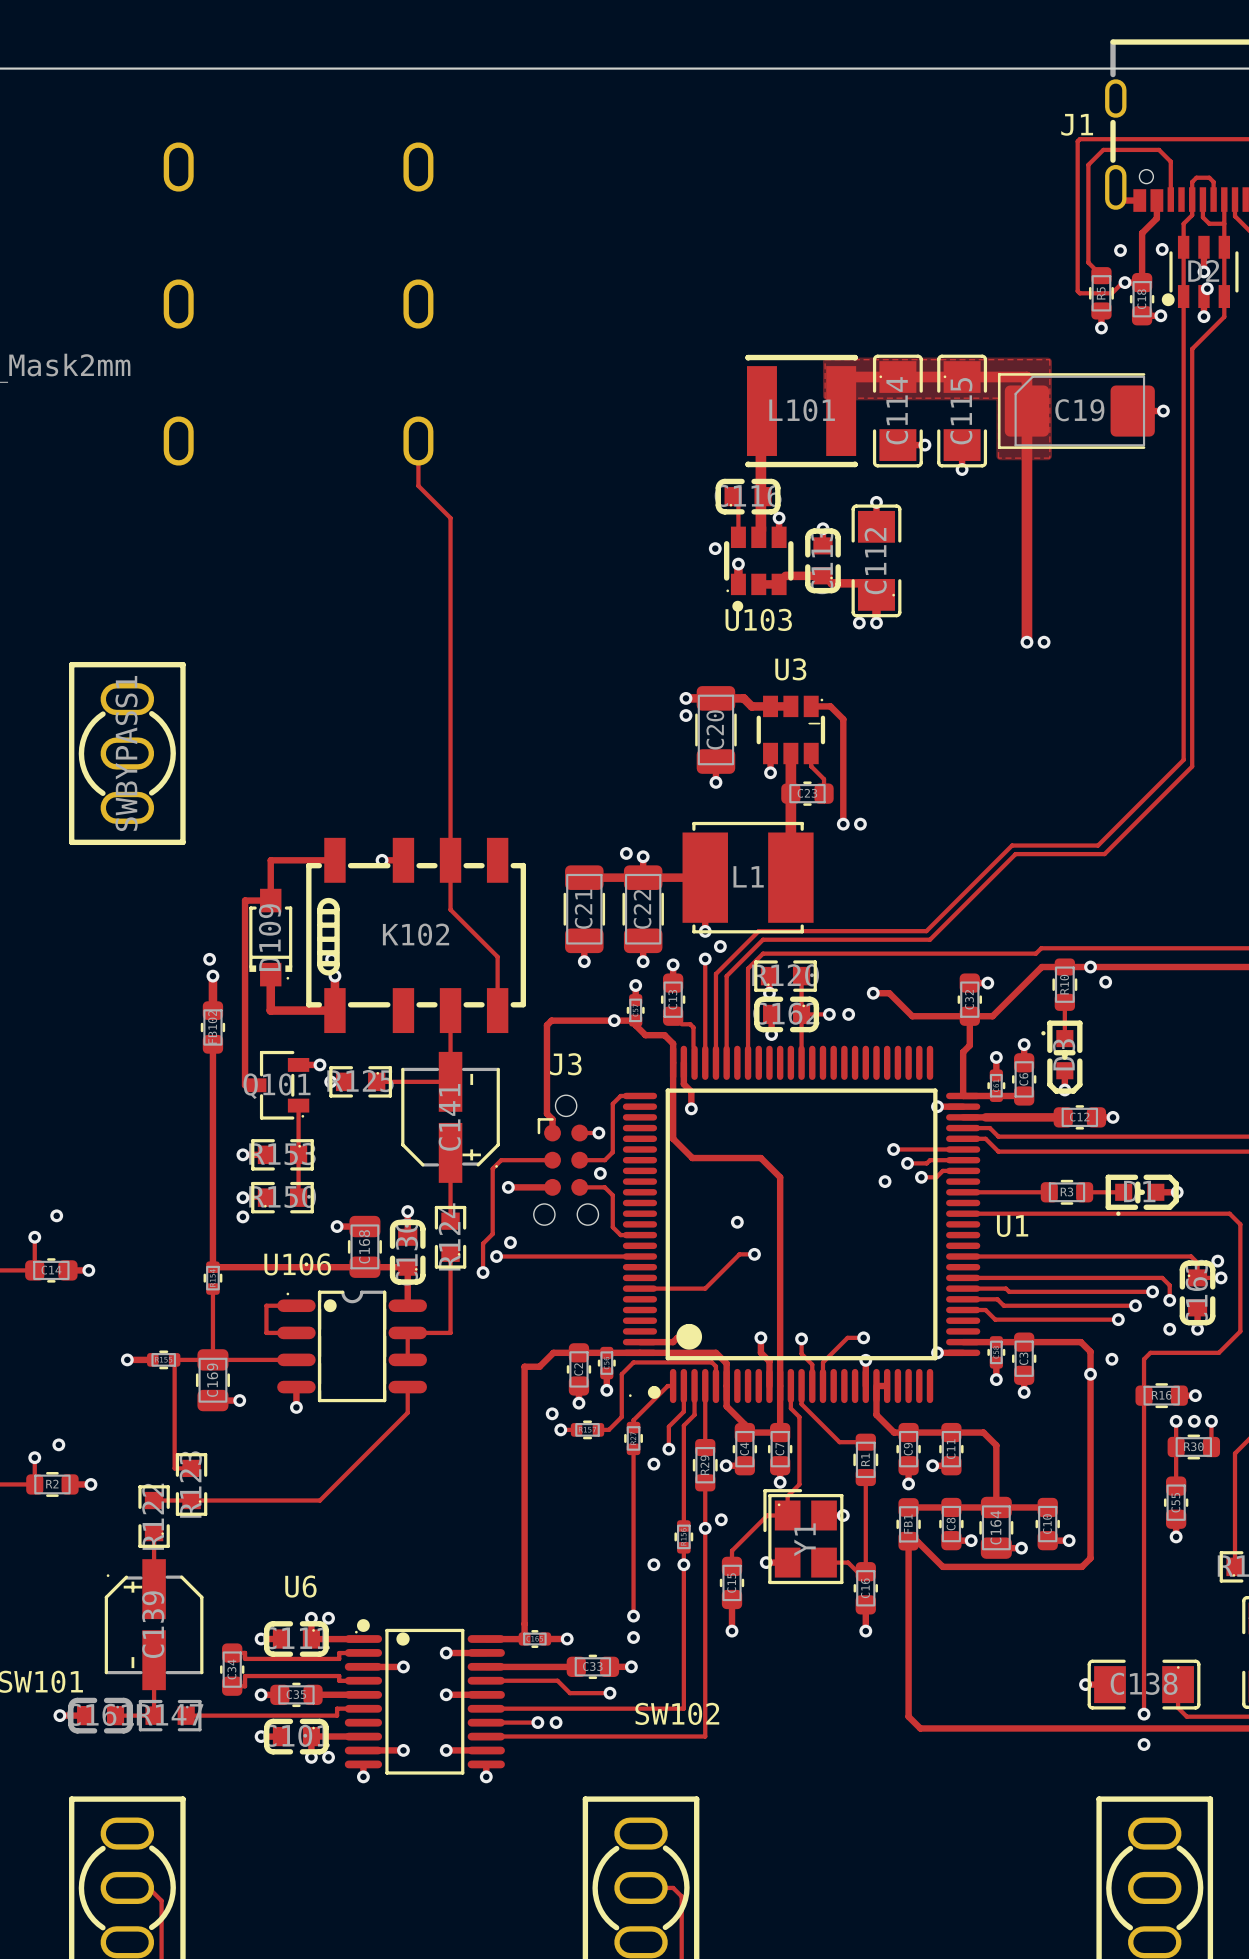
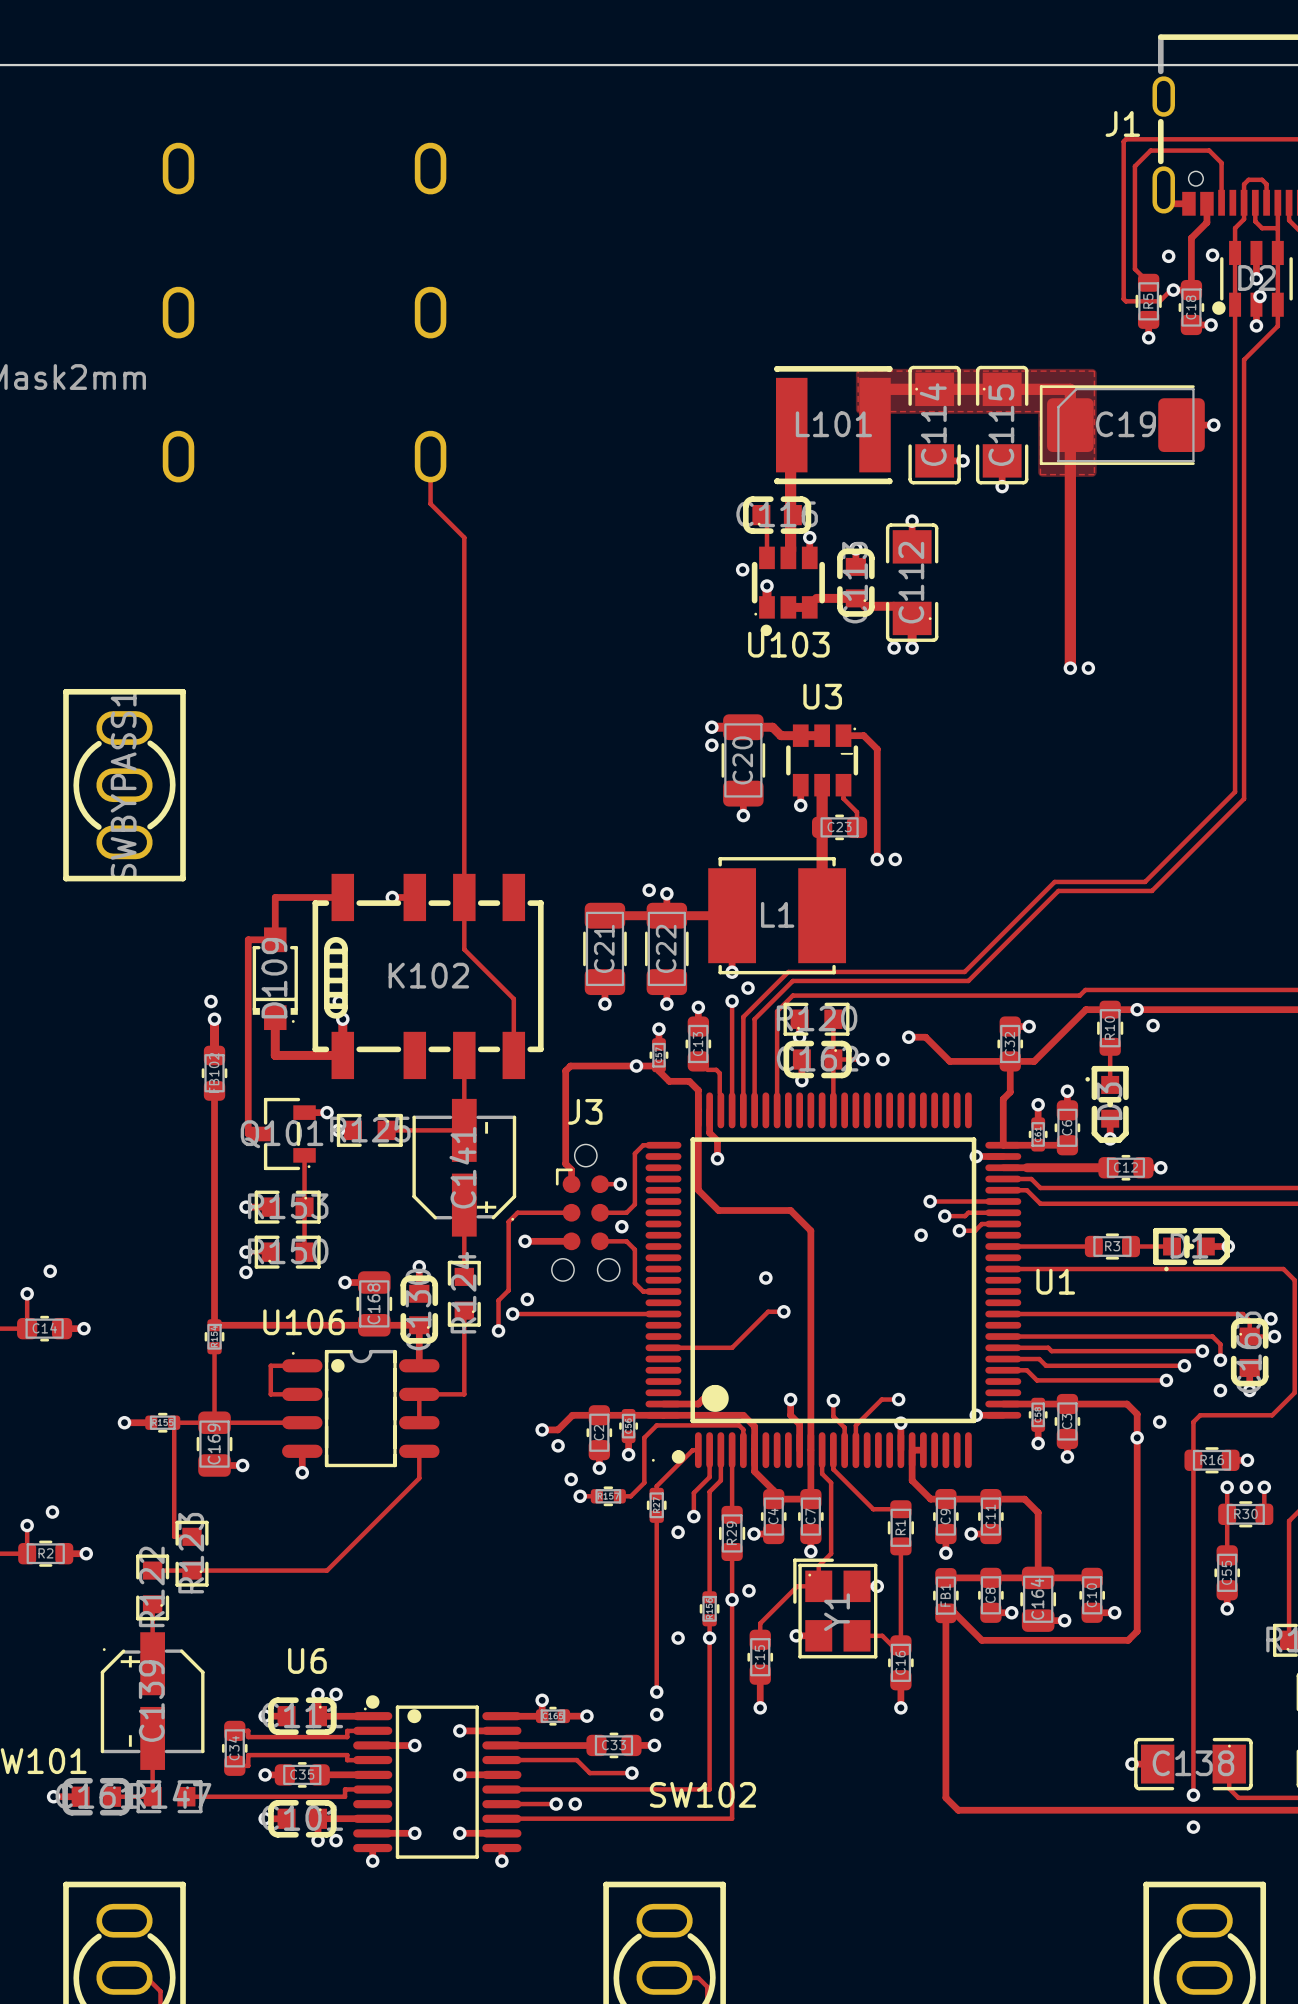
track: (524, 1366) (524, 1623) -> none
via: none -> (542, 1429)
via: none -> (558, 1445)
via: none -> (542, 1700)

